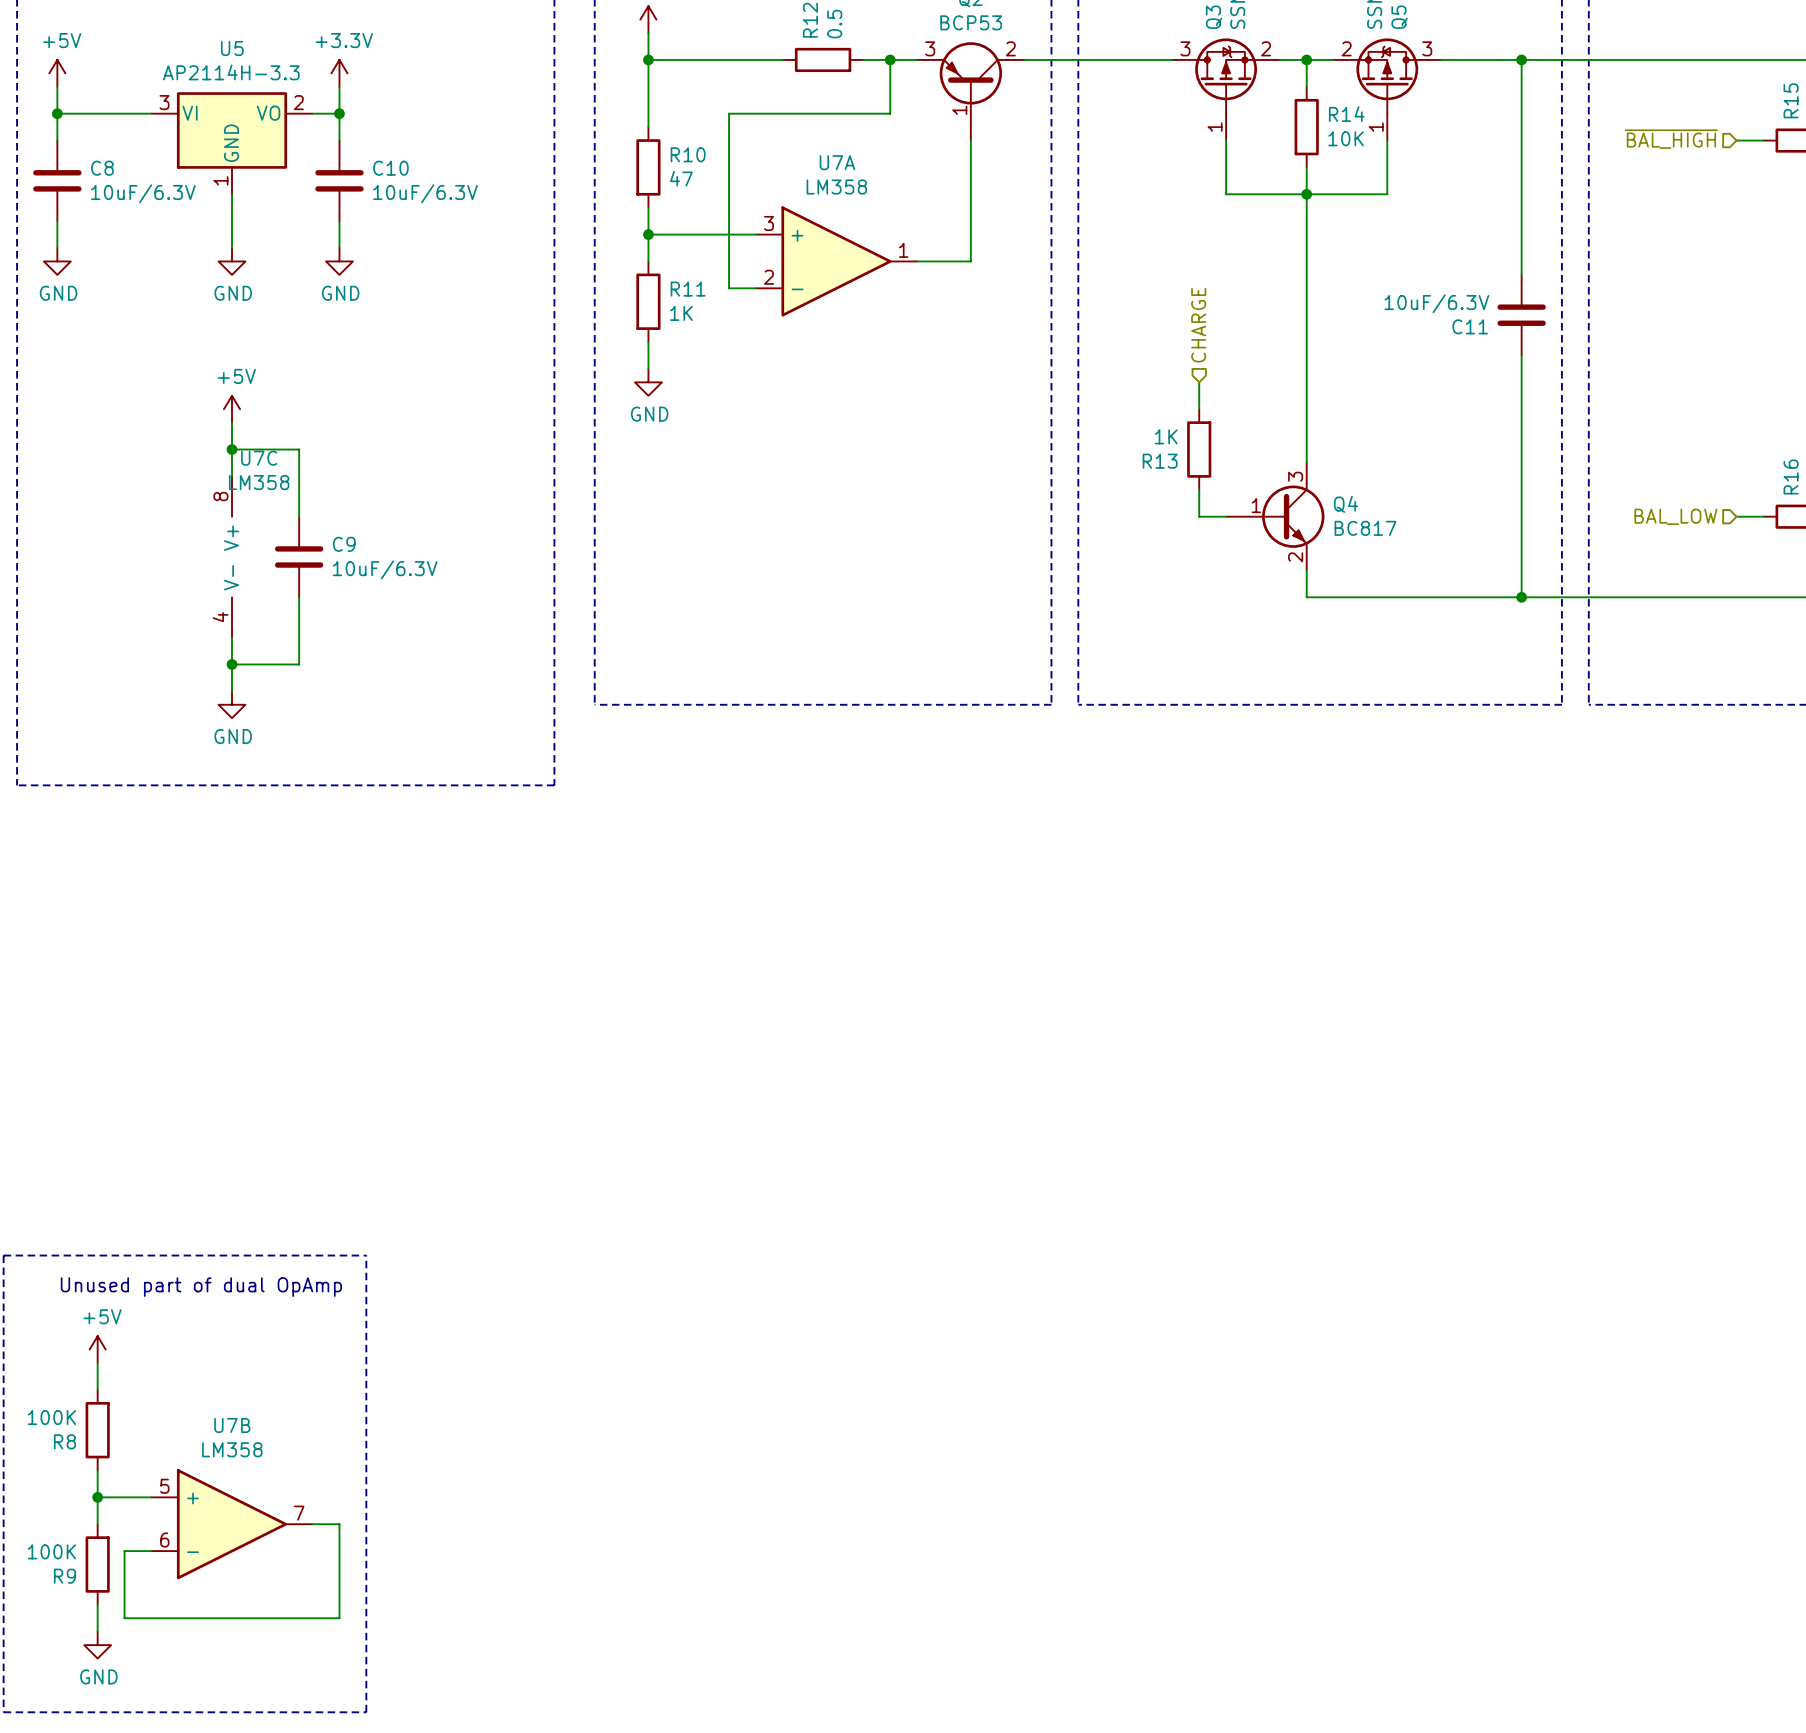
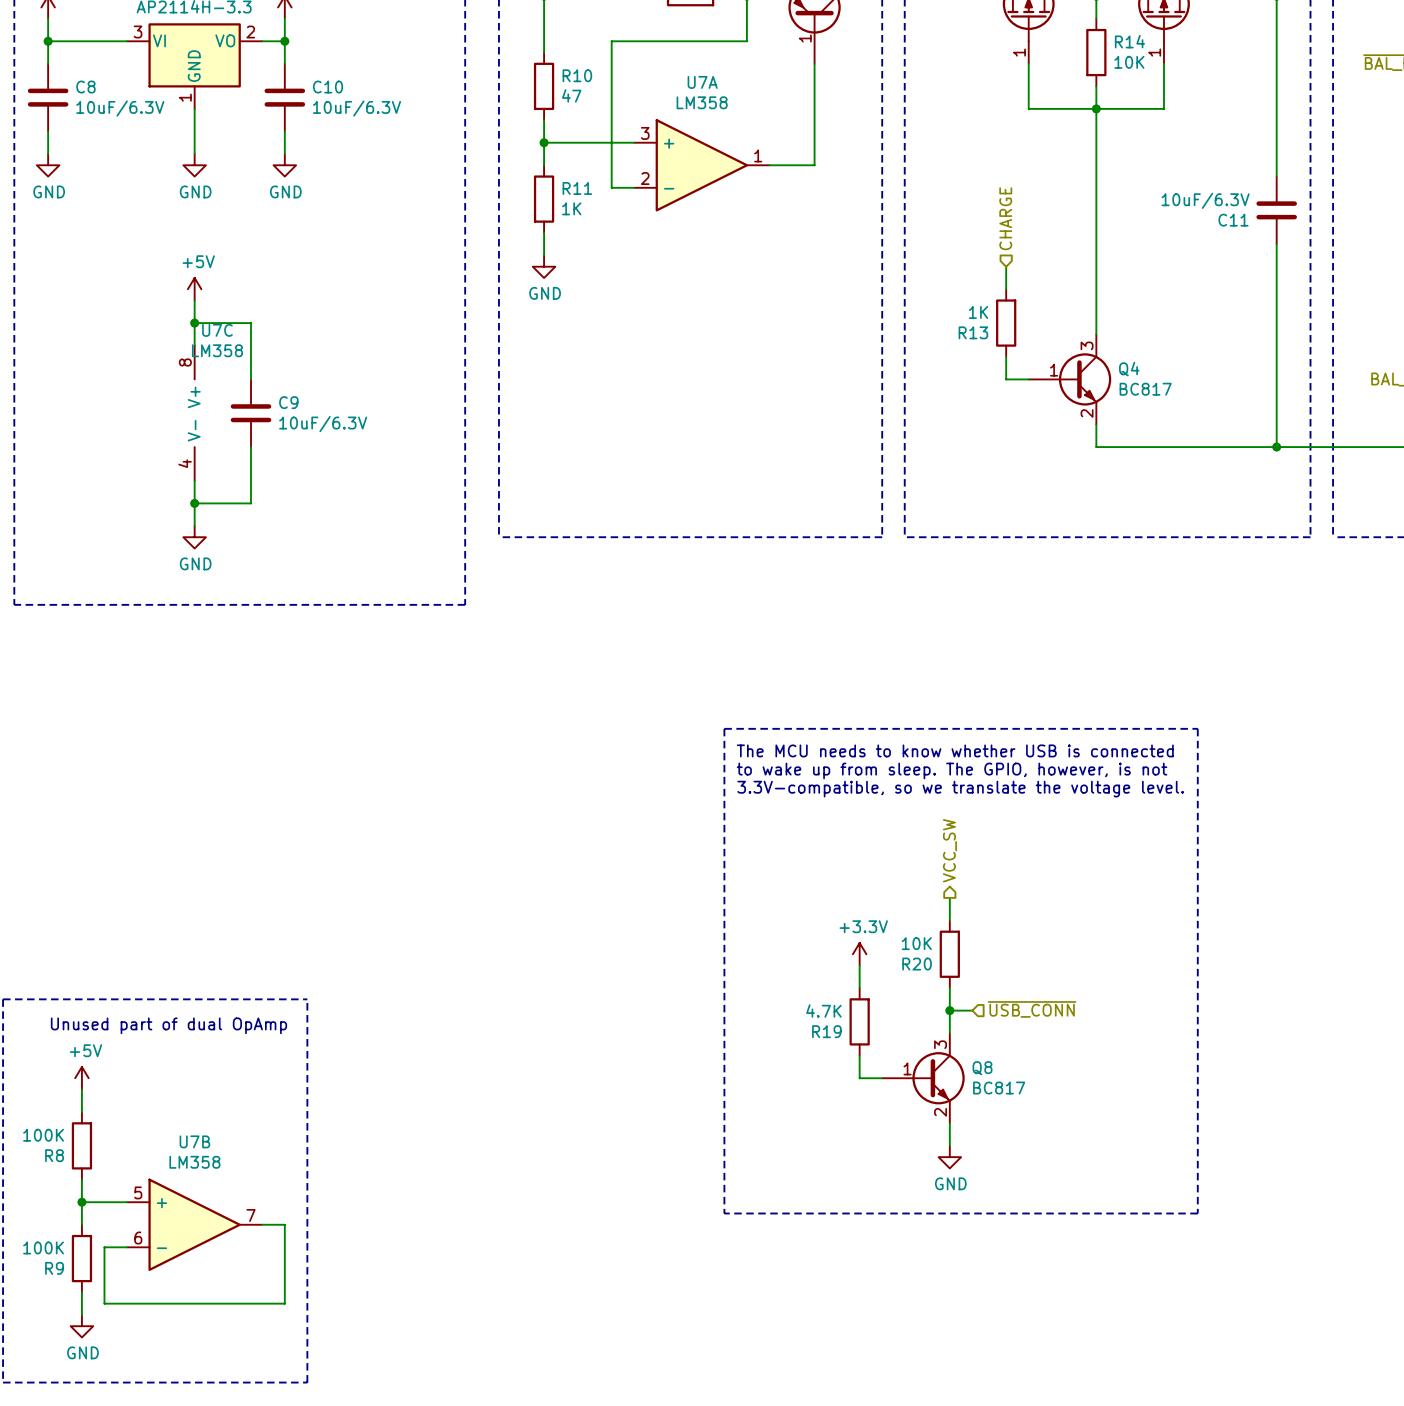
line: none -> (724, 728) (724, 1213) (1197, 1213) (1197, 728) (724, 728)
text: none -> The MCU needs to know whether USB is connected (955, 750)
text: none -> to wake up from sleep. The GPIO, however, is not (952, 770)
text: none -> 3.3V-compatible, so we translate the voltage level. (960, 789)
hierarchical label: none -> VCC_SW (949, 850)
wire: none -> (949, 897) (949, 920)
power symbol: none -> +3.3V (859, 954)
R20: none -> 10K (949, 954)
wire: none -> (859, 965) (859, 988)
wire: none -> (949, 988) (949, 1033)
hierarchical label: none -> ~{USB_CONN} (1032, 1009)
wire: none -> (949, 1010) (972, 1010)
junction: none -> (949, 1010)
R19: none -> 4.7K (859, 1021)
wire: none -> (859, 1055) (859, 1078) (882, 1078)
Q8: none -> BC817 (923, 1078)
wire: none -> (949, 1123) (949, 1145)
power symbol: none -> GND (949, 1157)

